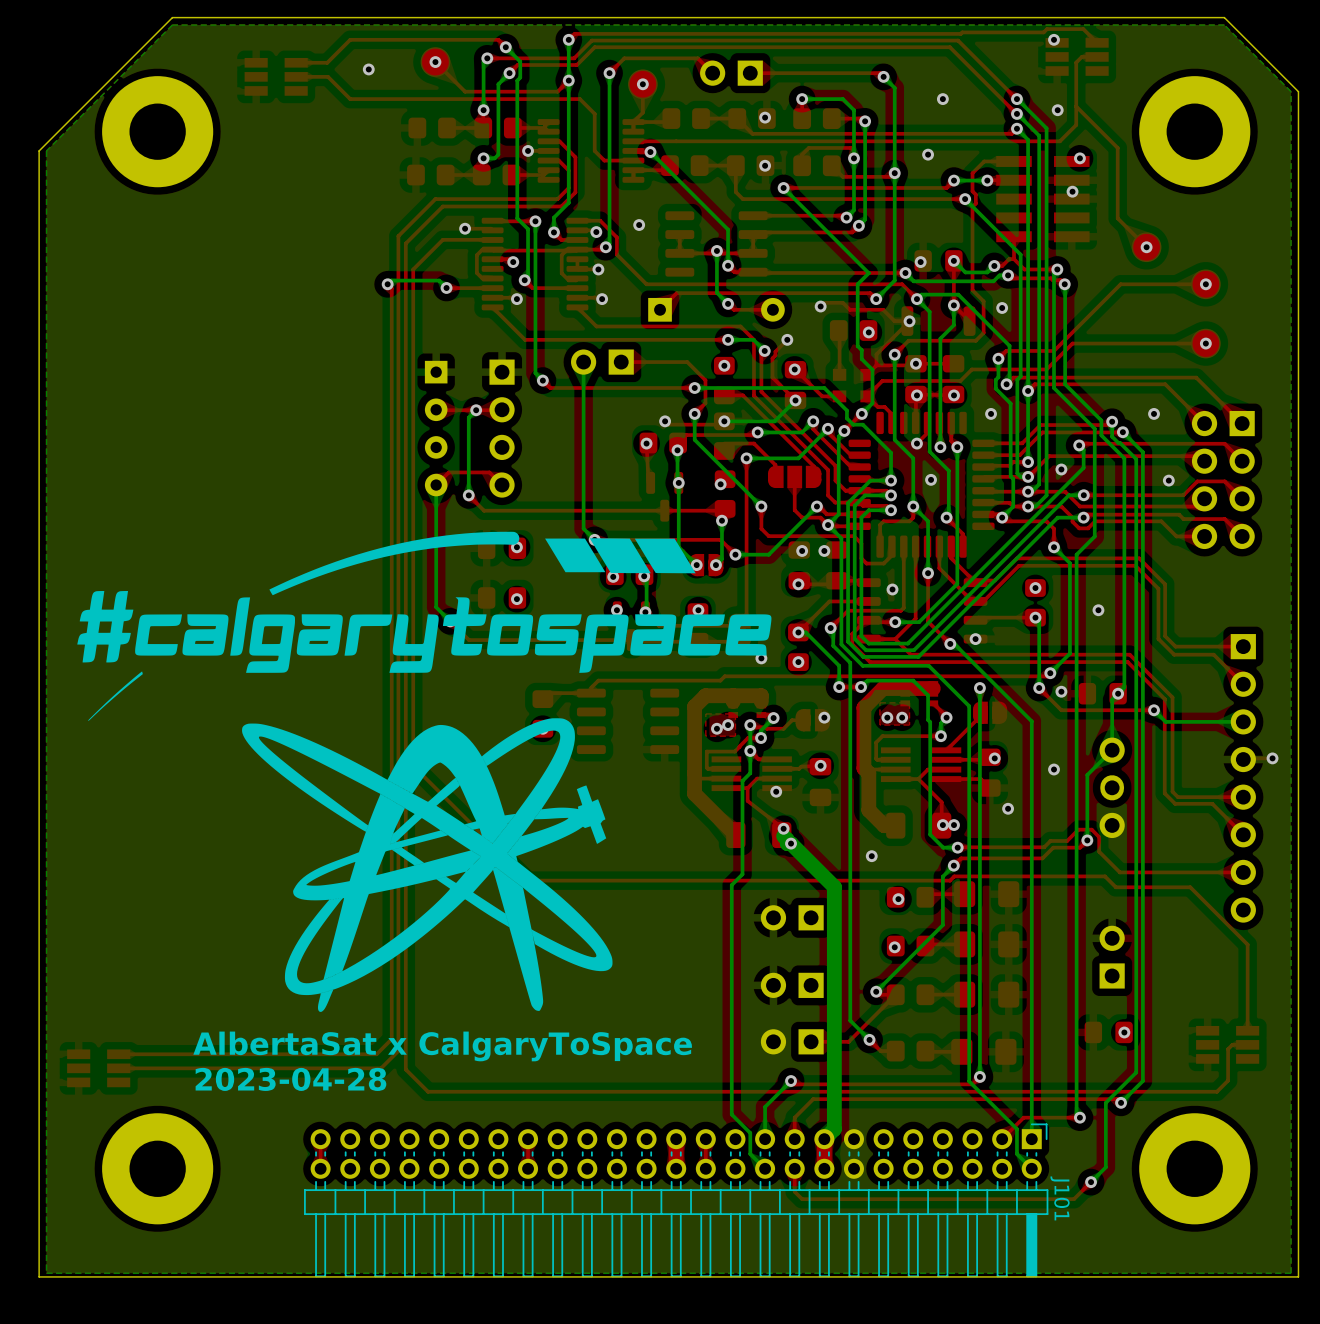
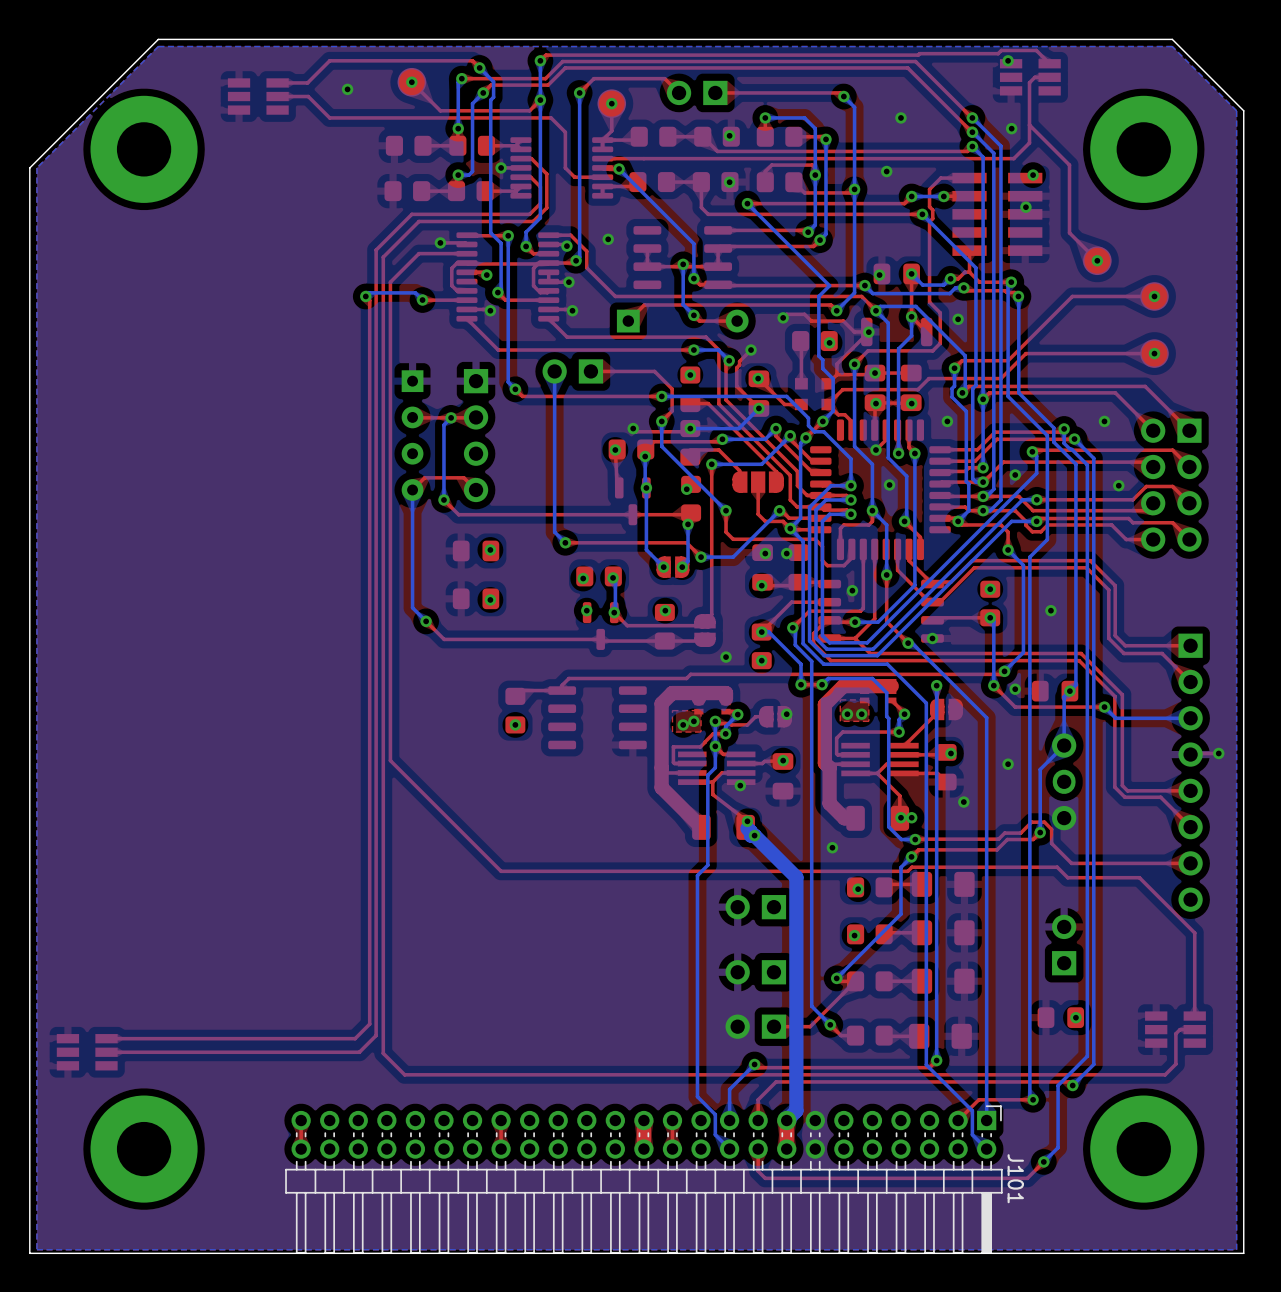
drawing: [77, 502, 772, 1012] -> none
text: AlbertaSat x CalgaryToSpace (442, 1046) -> none
text: 2023-04-28 (290, 1079) -> none

